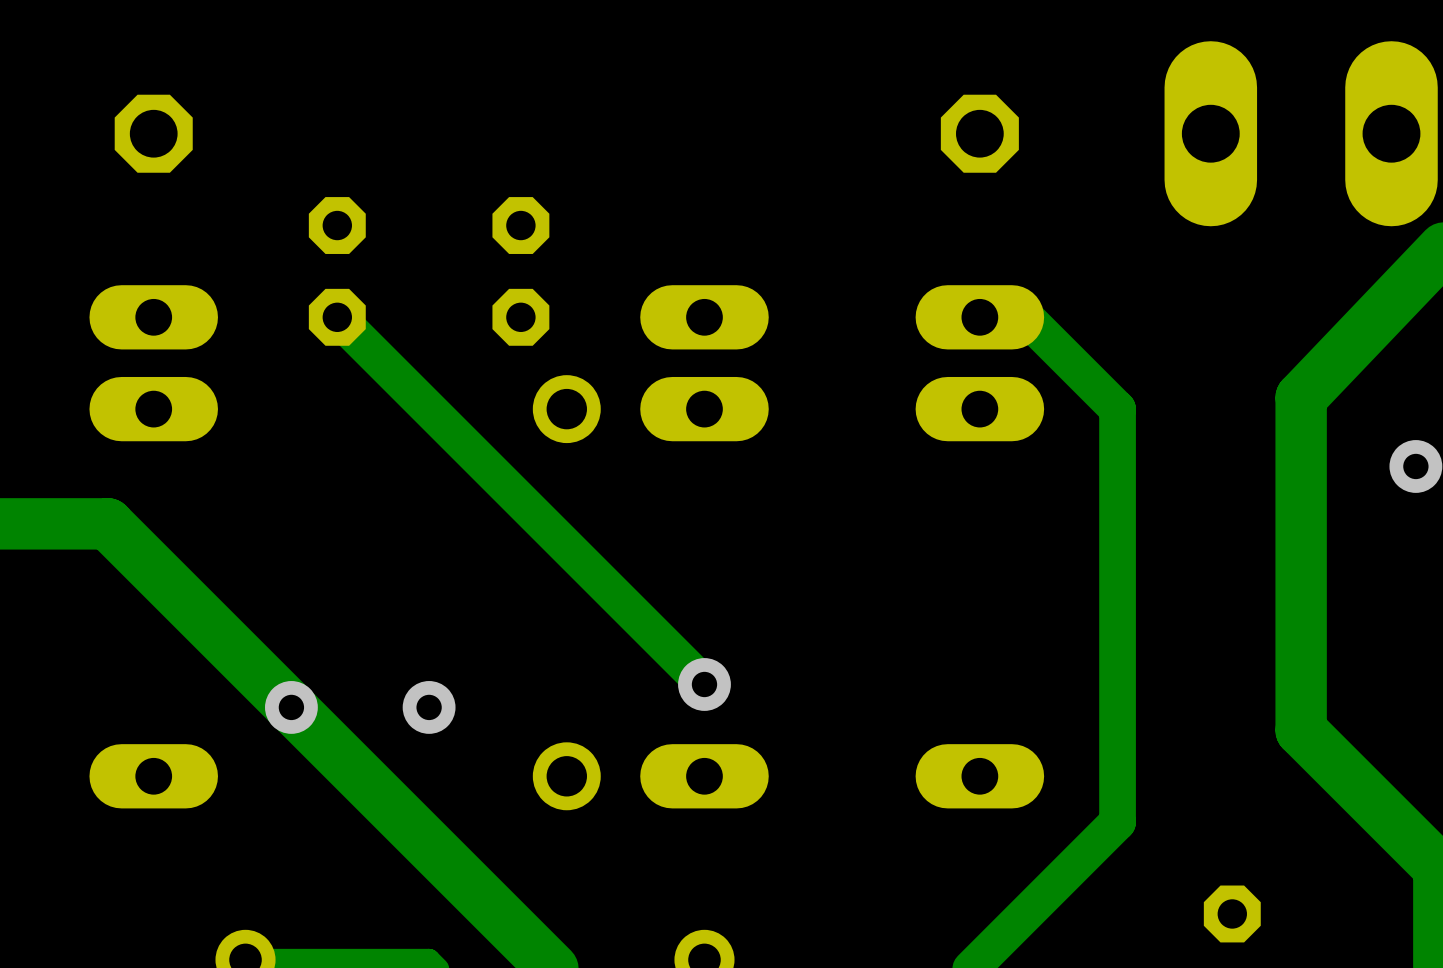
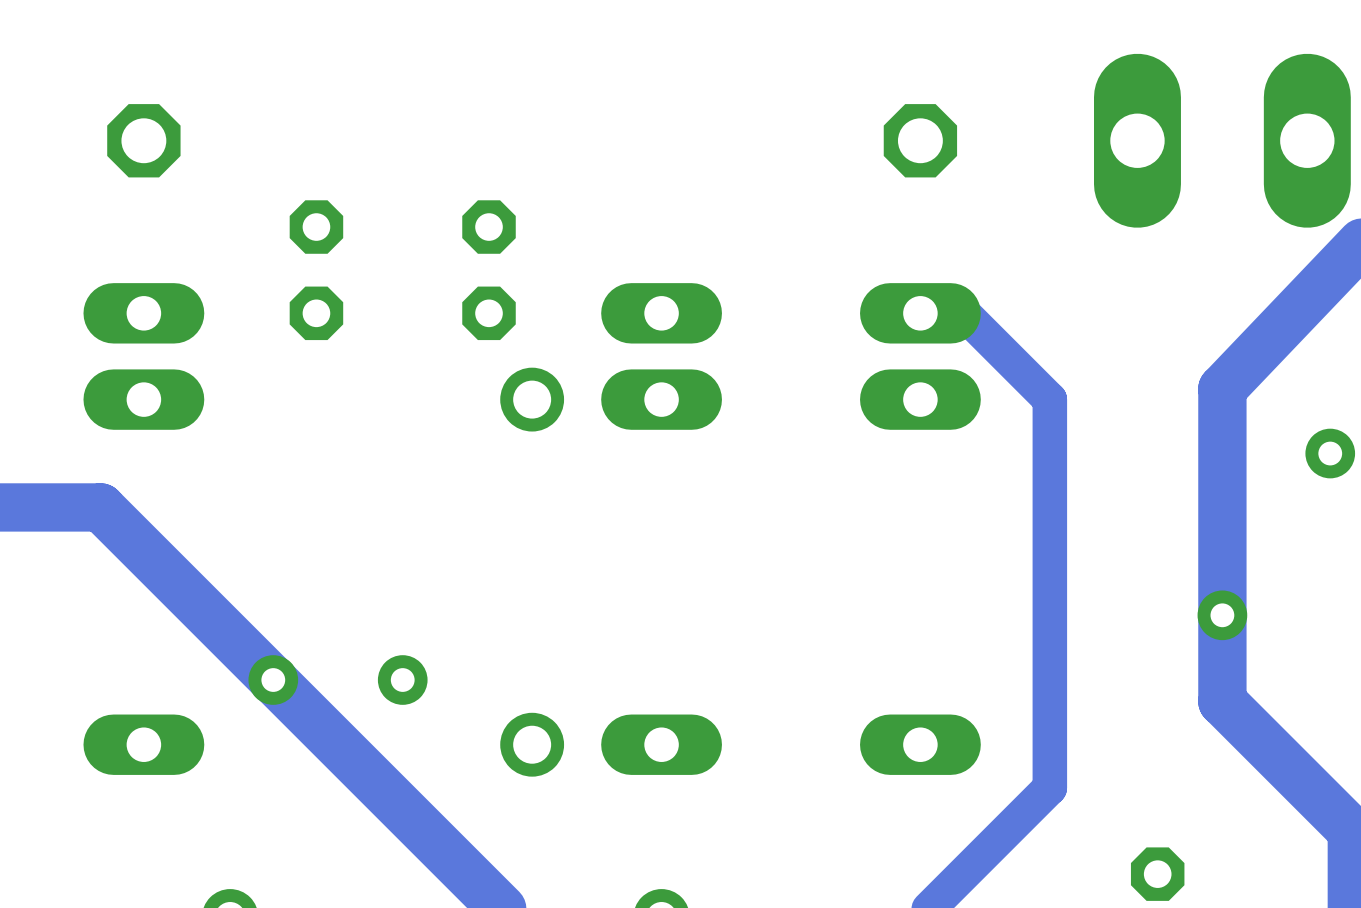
track: (337, 317) (704, 684) -> none
via: none -> (1222, 615)
via: (704, 684) -> none

